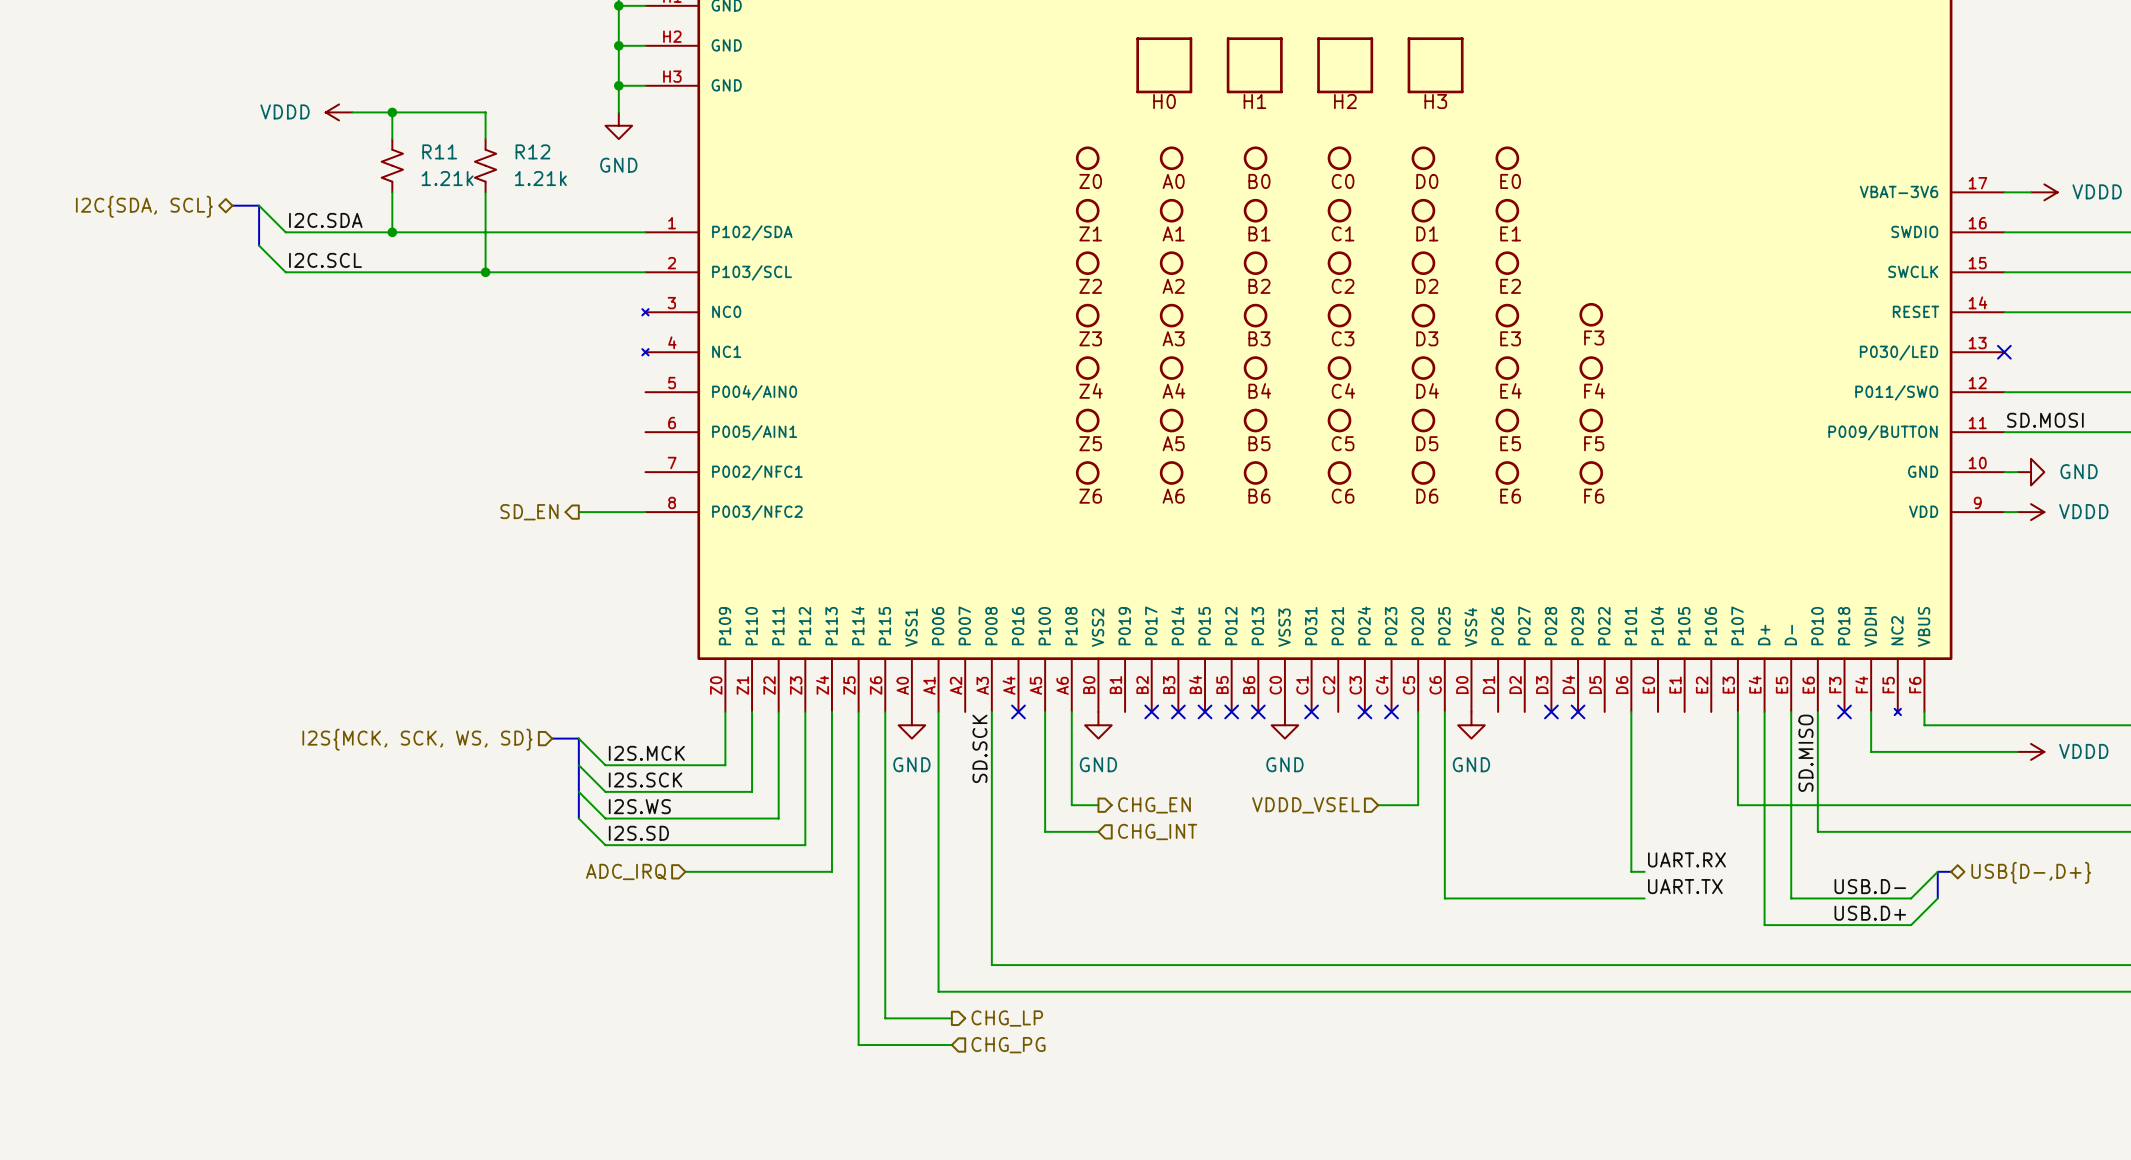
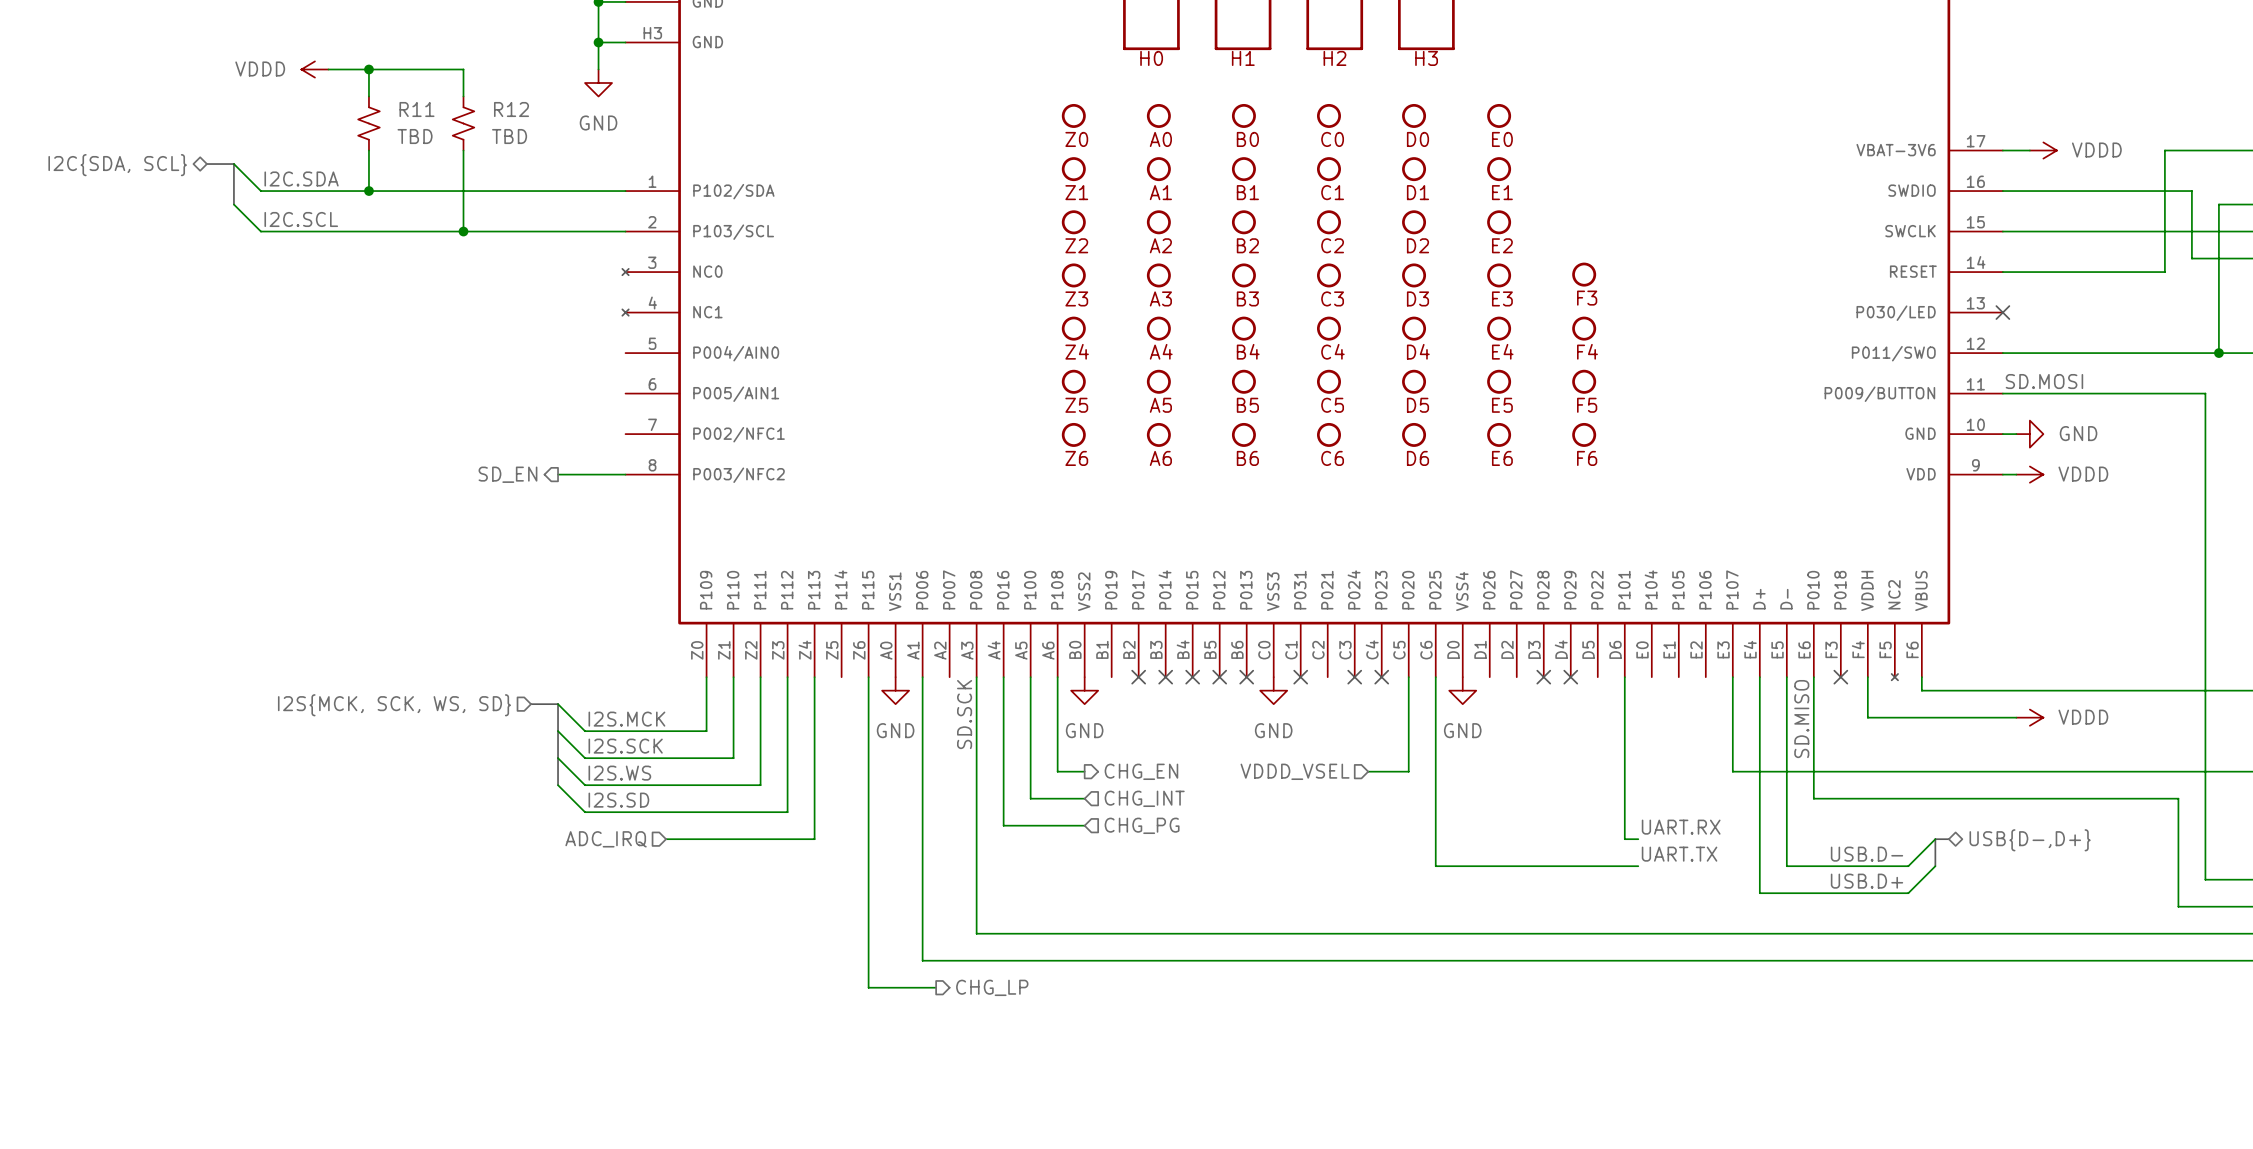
R11 value: 1.21k (447, 178) -> TBD (415, 136)
R12 value: 1.21k (540, 178) -> TBD (509, 136)
wire: (858, 711) (858, 1045) (951, 1045) -> none
wire: none -> (1003, 677) (1003, 825) (1084, 825)
no-connect mark: (1018, 711) -> none
hierarchical label position: CHG_PG (1008, 1045) -> CHG_PG (1142, 825)

